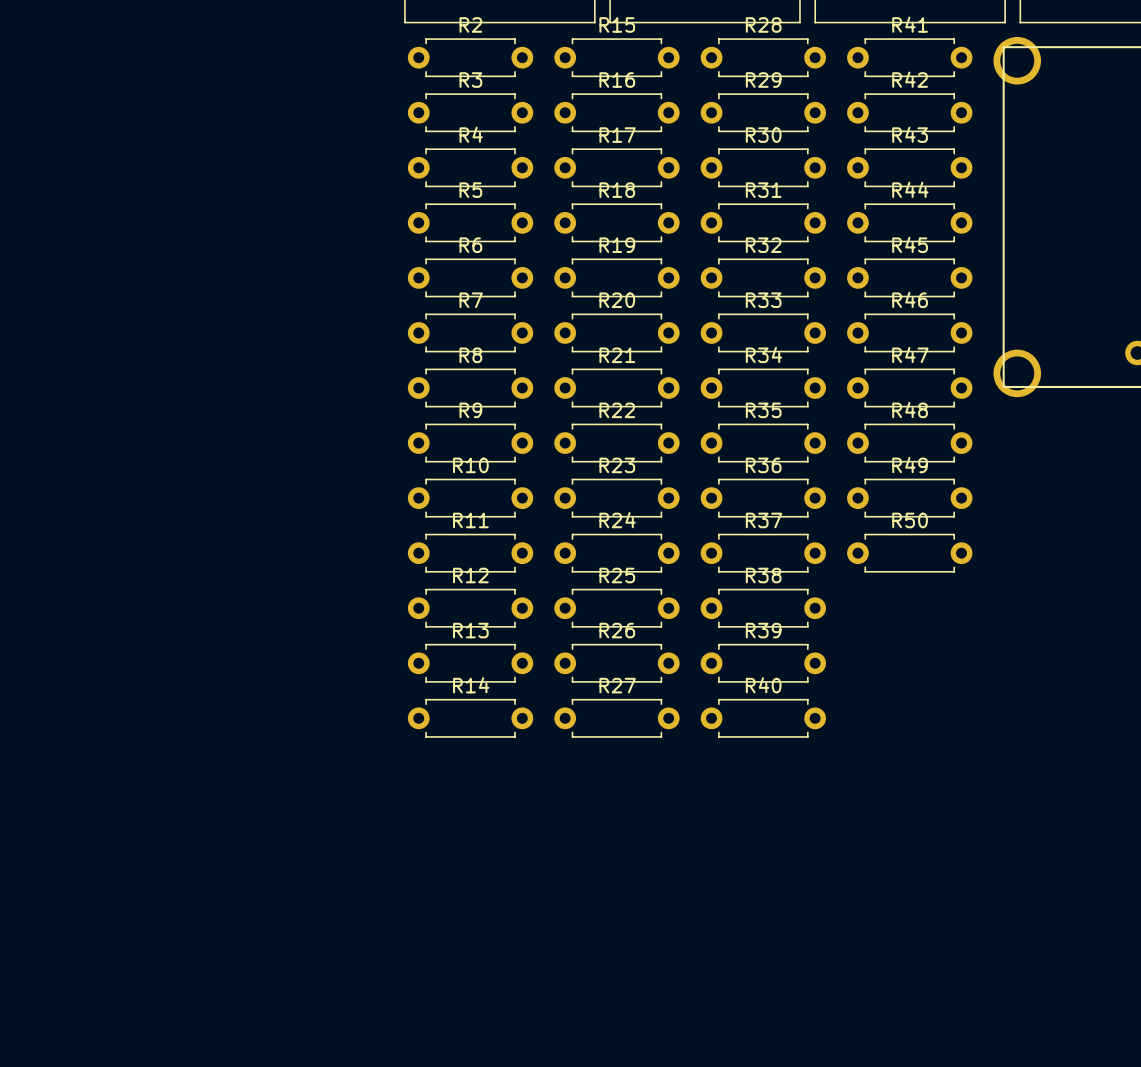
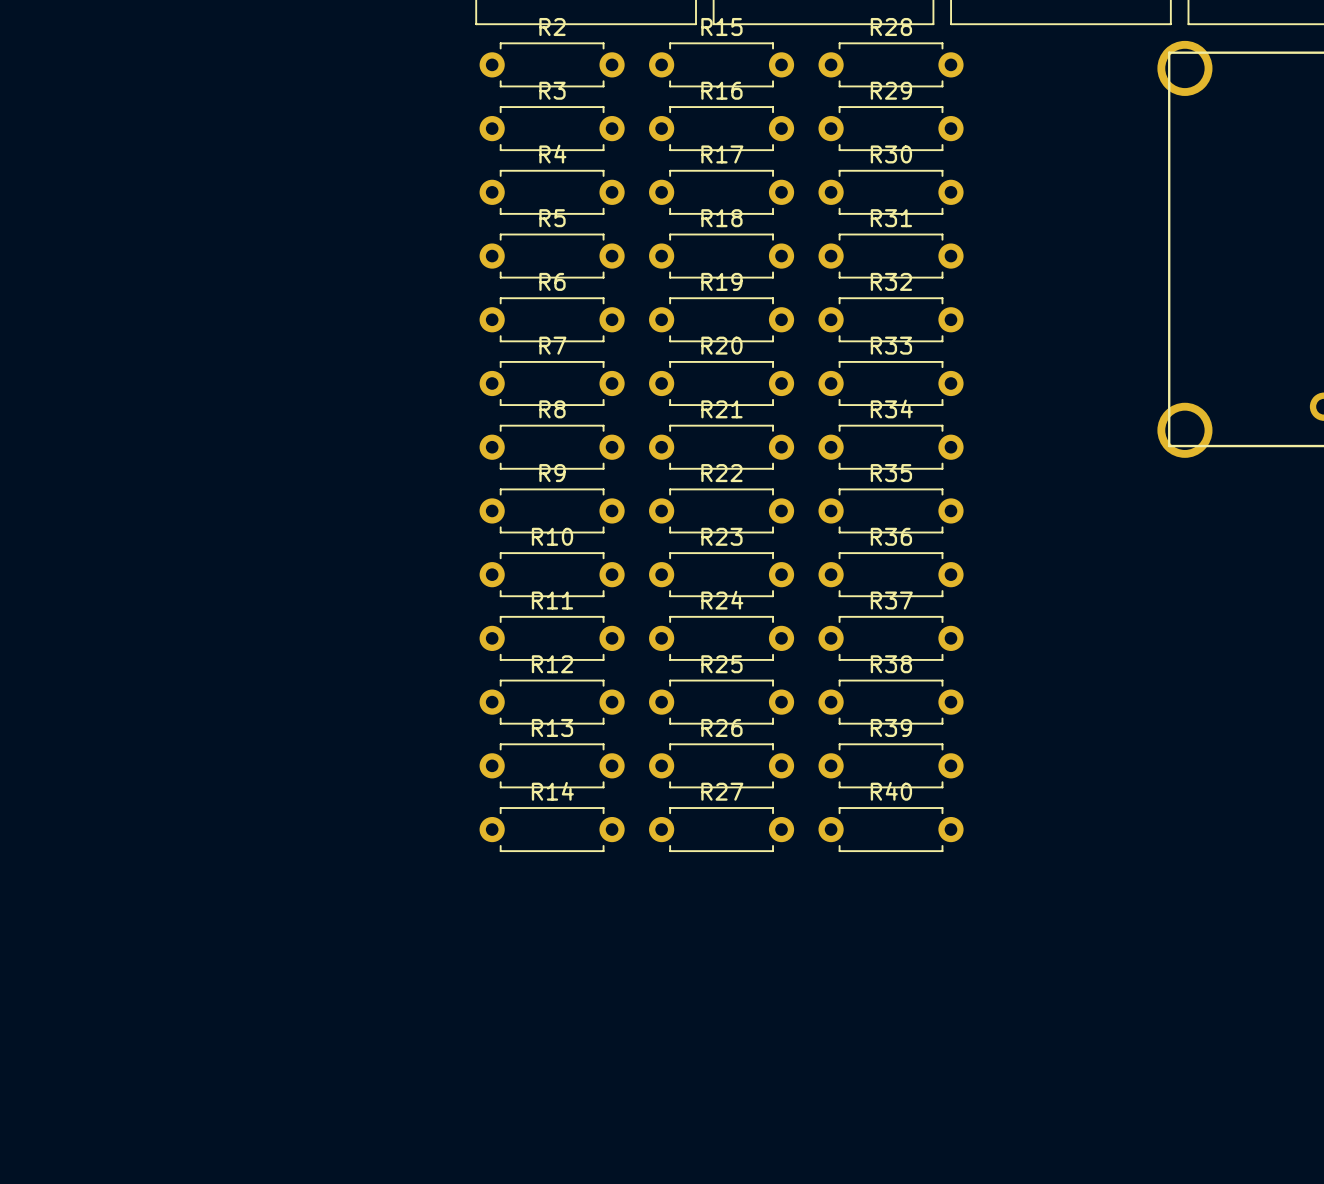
R41: (909, 57) -> none
R42: (909, 112) -> none
R43: (909, 167) -> none
R44: (909, 222) -> none
R45: (909, 277) -> none
R46: (909, 332) -> none
R47: (909, 388) -> none
R48: (909, 443) -> none
R49: (909, 498) -> none
R50: (909, 553) -> none

